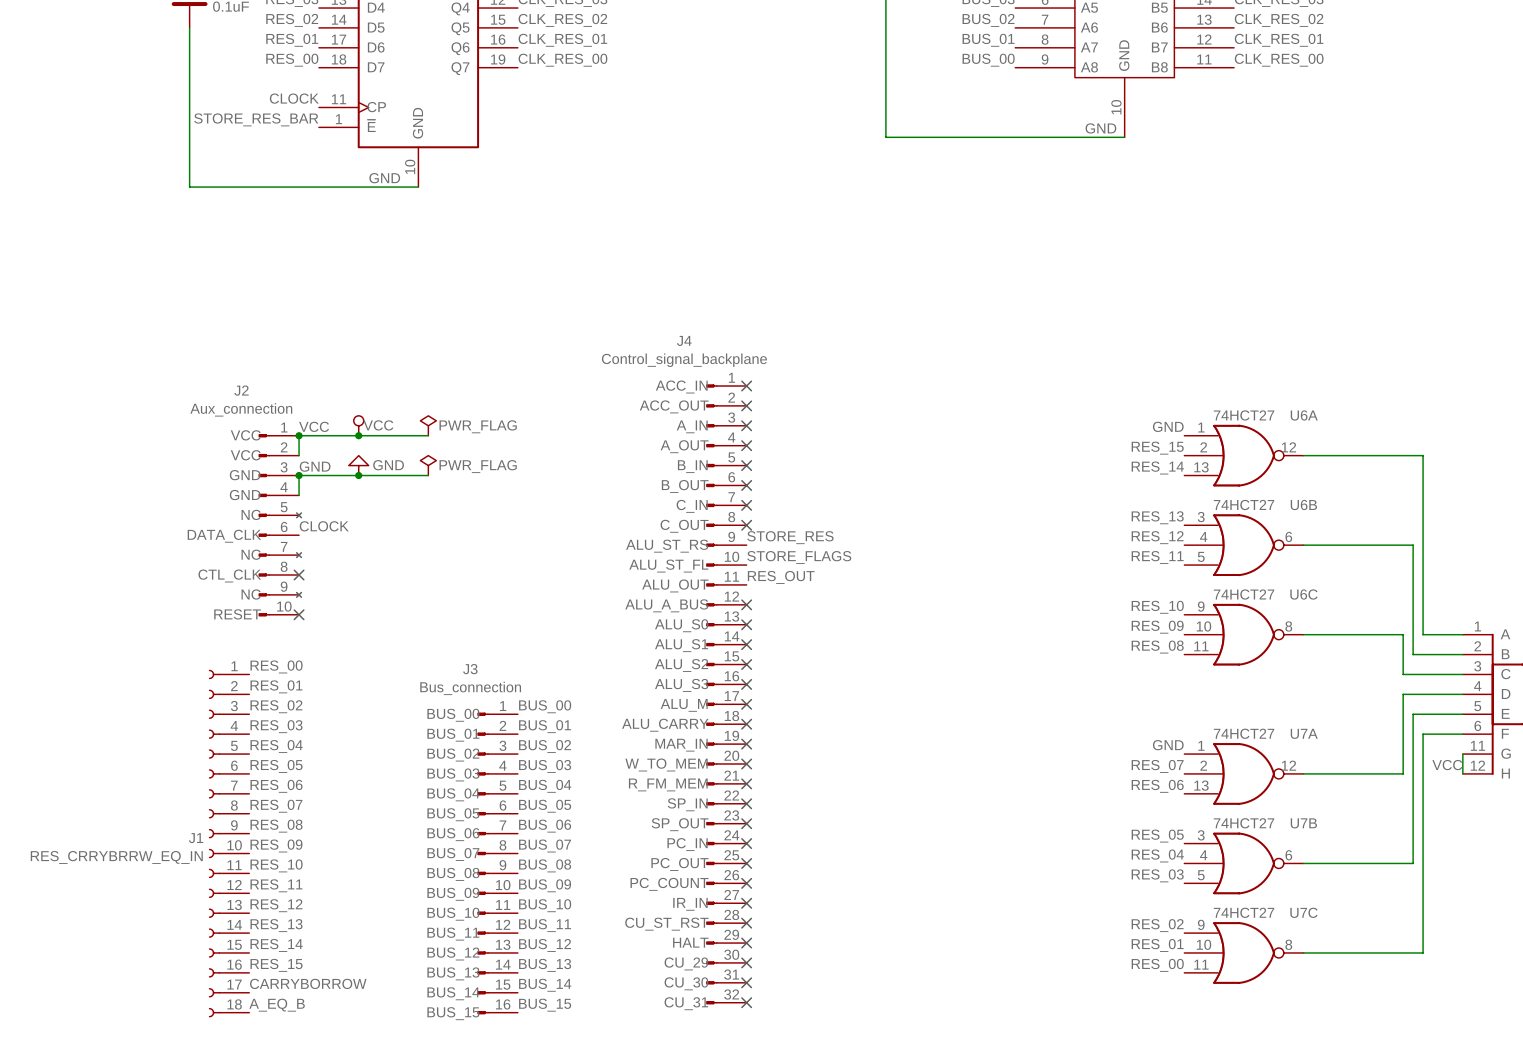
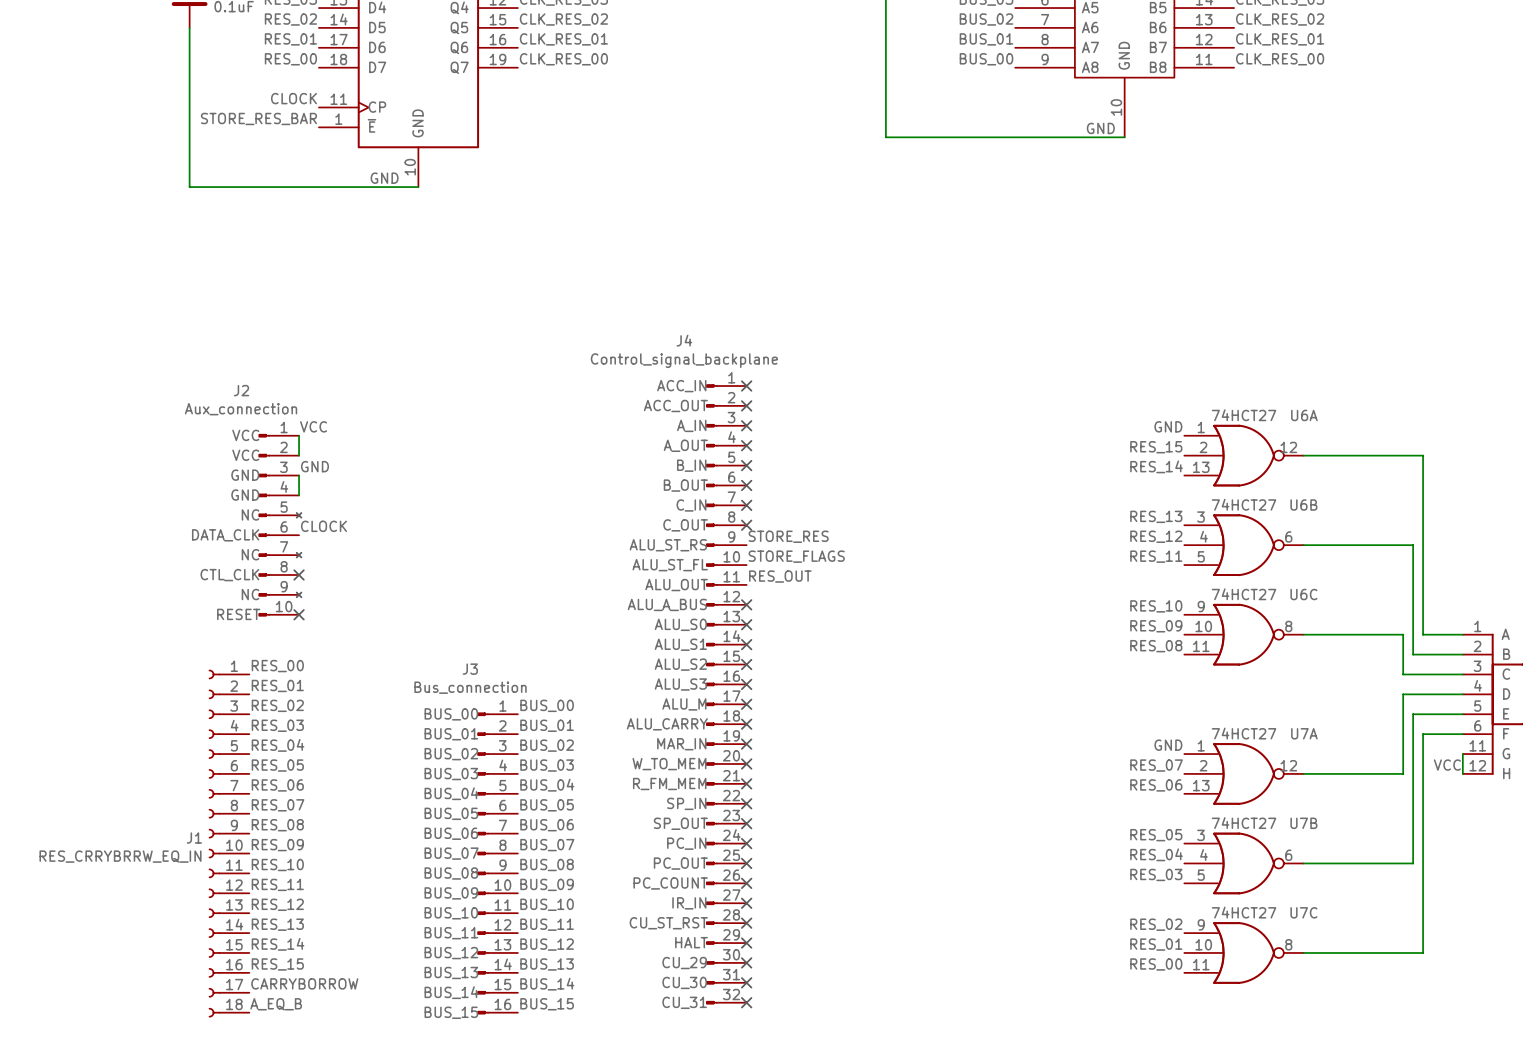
power symbol: VCC (358, 425) -> none
power symbol: PWR_FLAG (428, 425) -> none
wire: (299, 435) (428, 435) -> none
junction: (299, 435) -> none
junction: (358, 435) -> none
power symbol: GND (358, 465) -> none
power symbol: PWR_FLAG (428, 465) -> none
wire: (299, 475) (428, 475) -> none
junction: (299, 475) -> none
junction: (358, 475) -> none

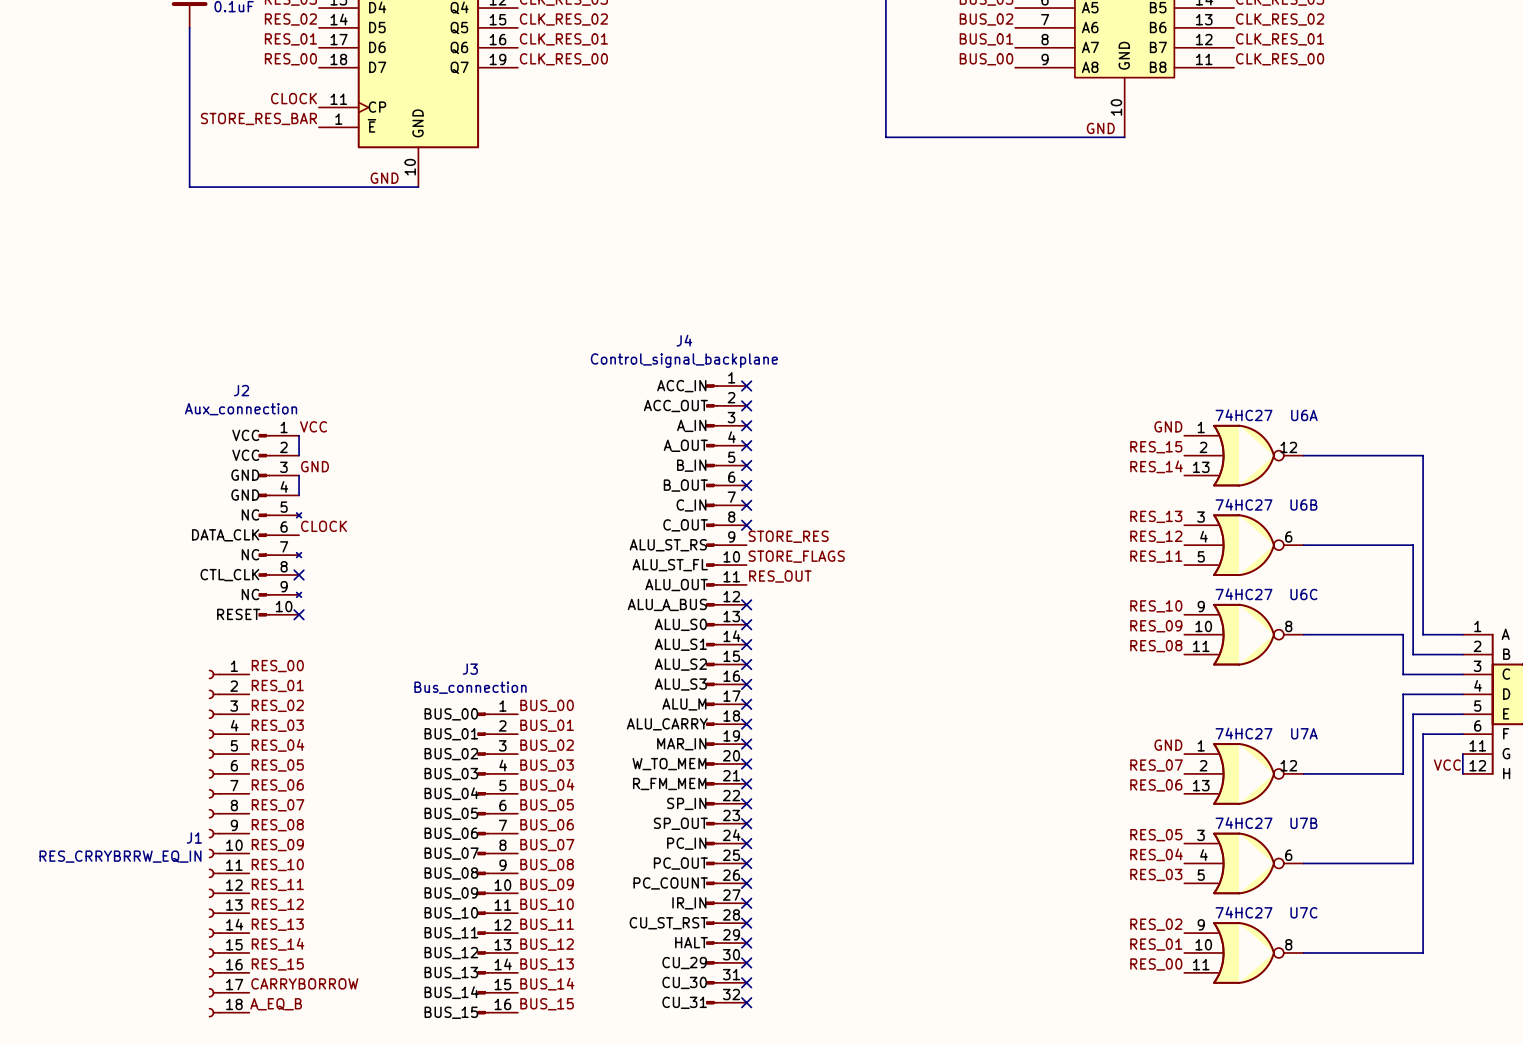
U6A value: 74HCT27 (1244, 415) -> 74HC27 (1244, 415)
U6B value: 74HCT27 (1244, 504) -> 74HC27 (1244, 504)
U6C value: 74HCT27 (1244, 594) -> 74HC27 (1244, 594)
U7A value: 74HCT27 (1244, 733) -> 74HC27 (1244, 733)
U7B value: 74HCT27 (1244, 823) -> 74HC27 (1244, 823)
U7C value: 74HCT27 (1244, 912) -> 74HC27 (1244, 912)

